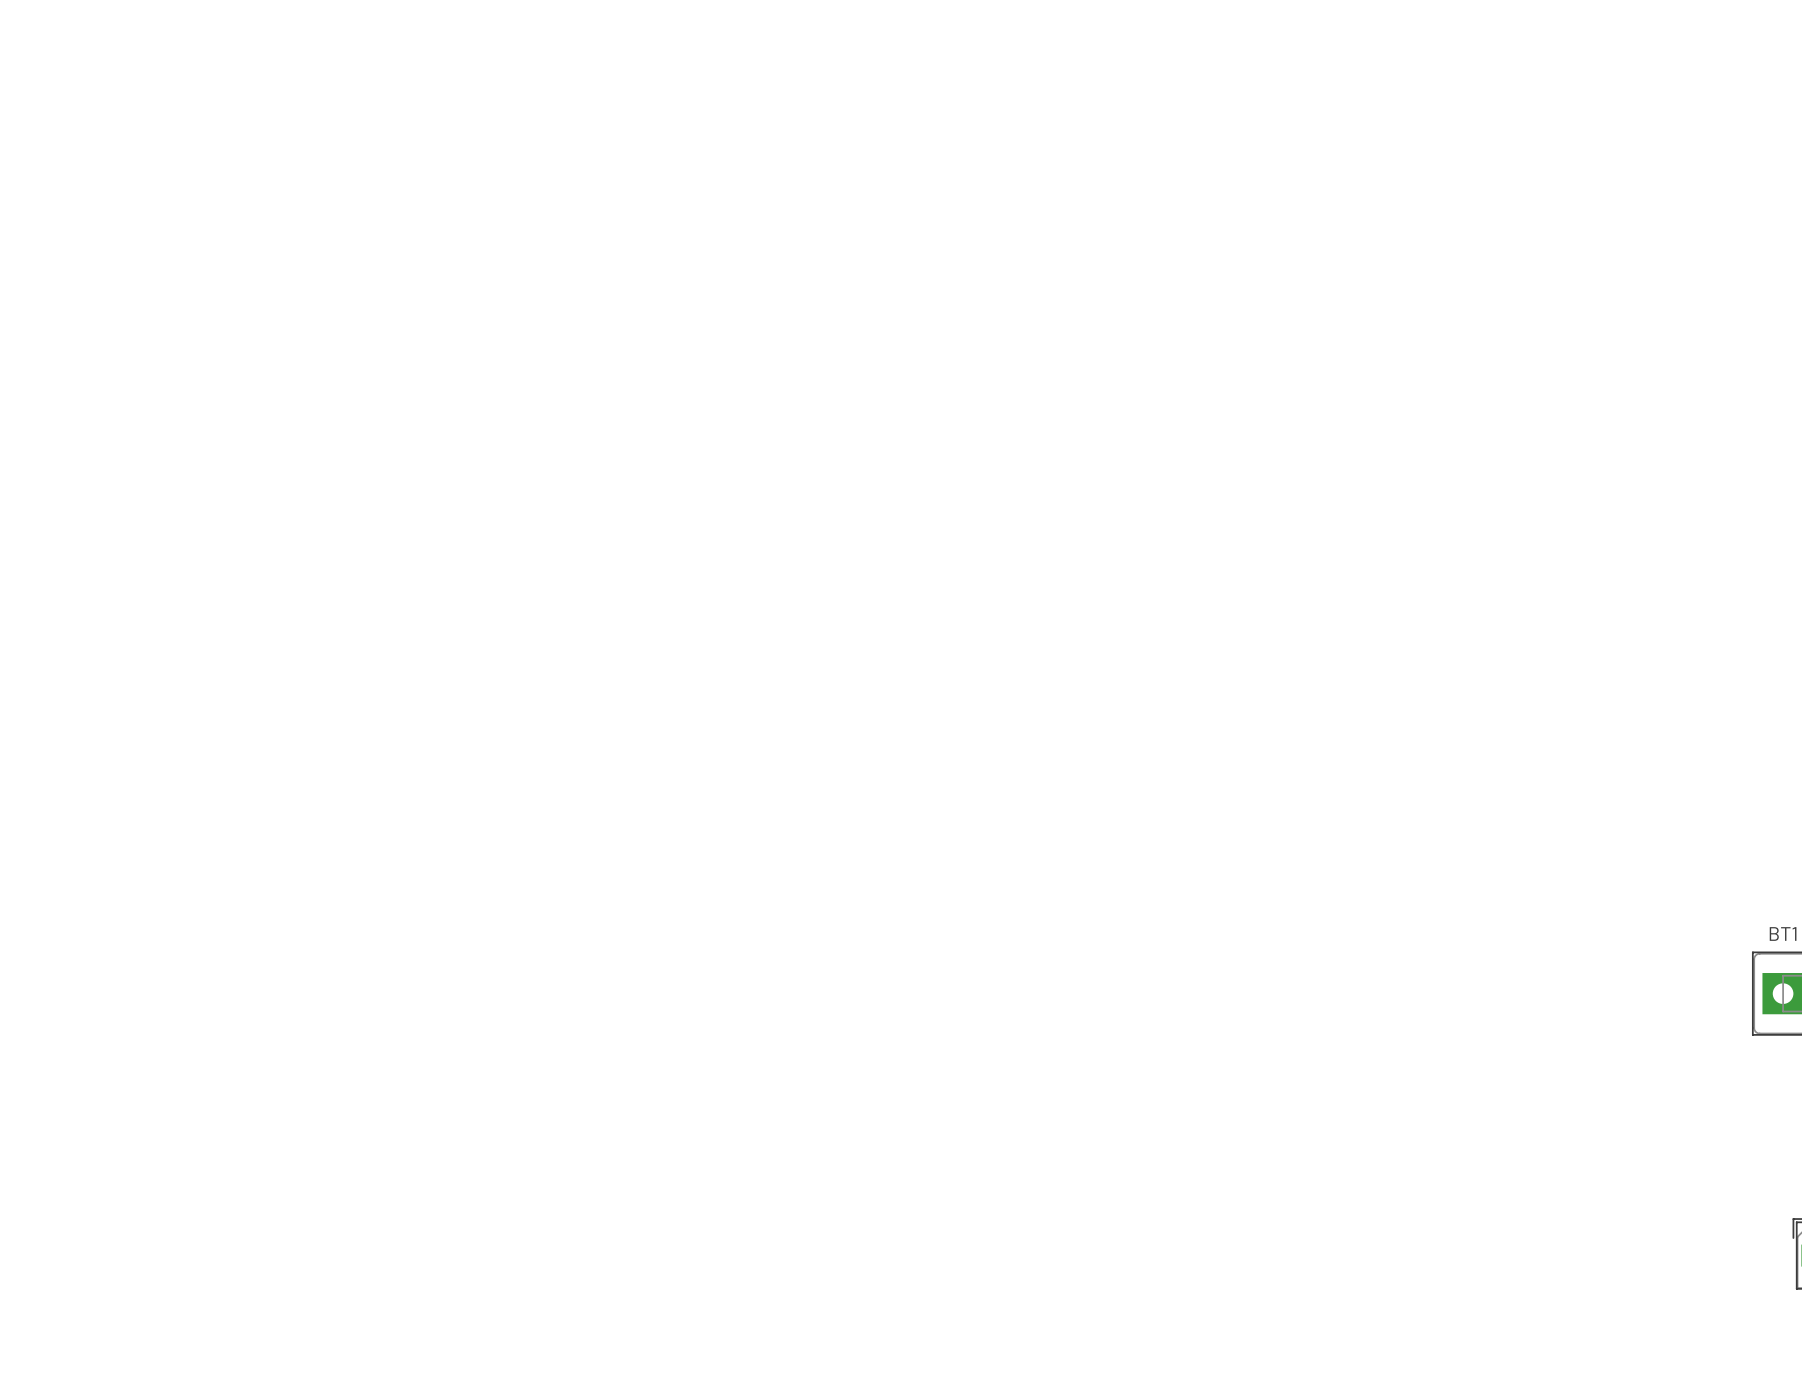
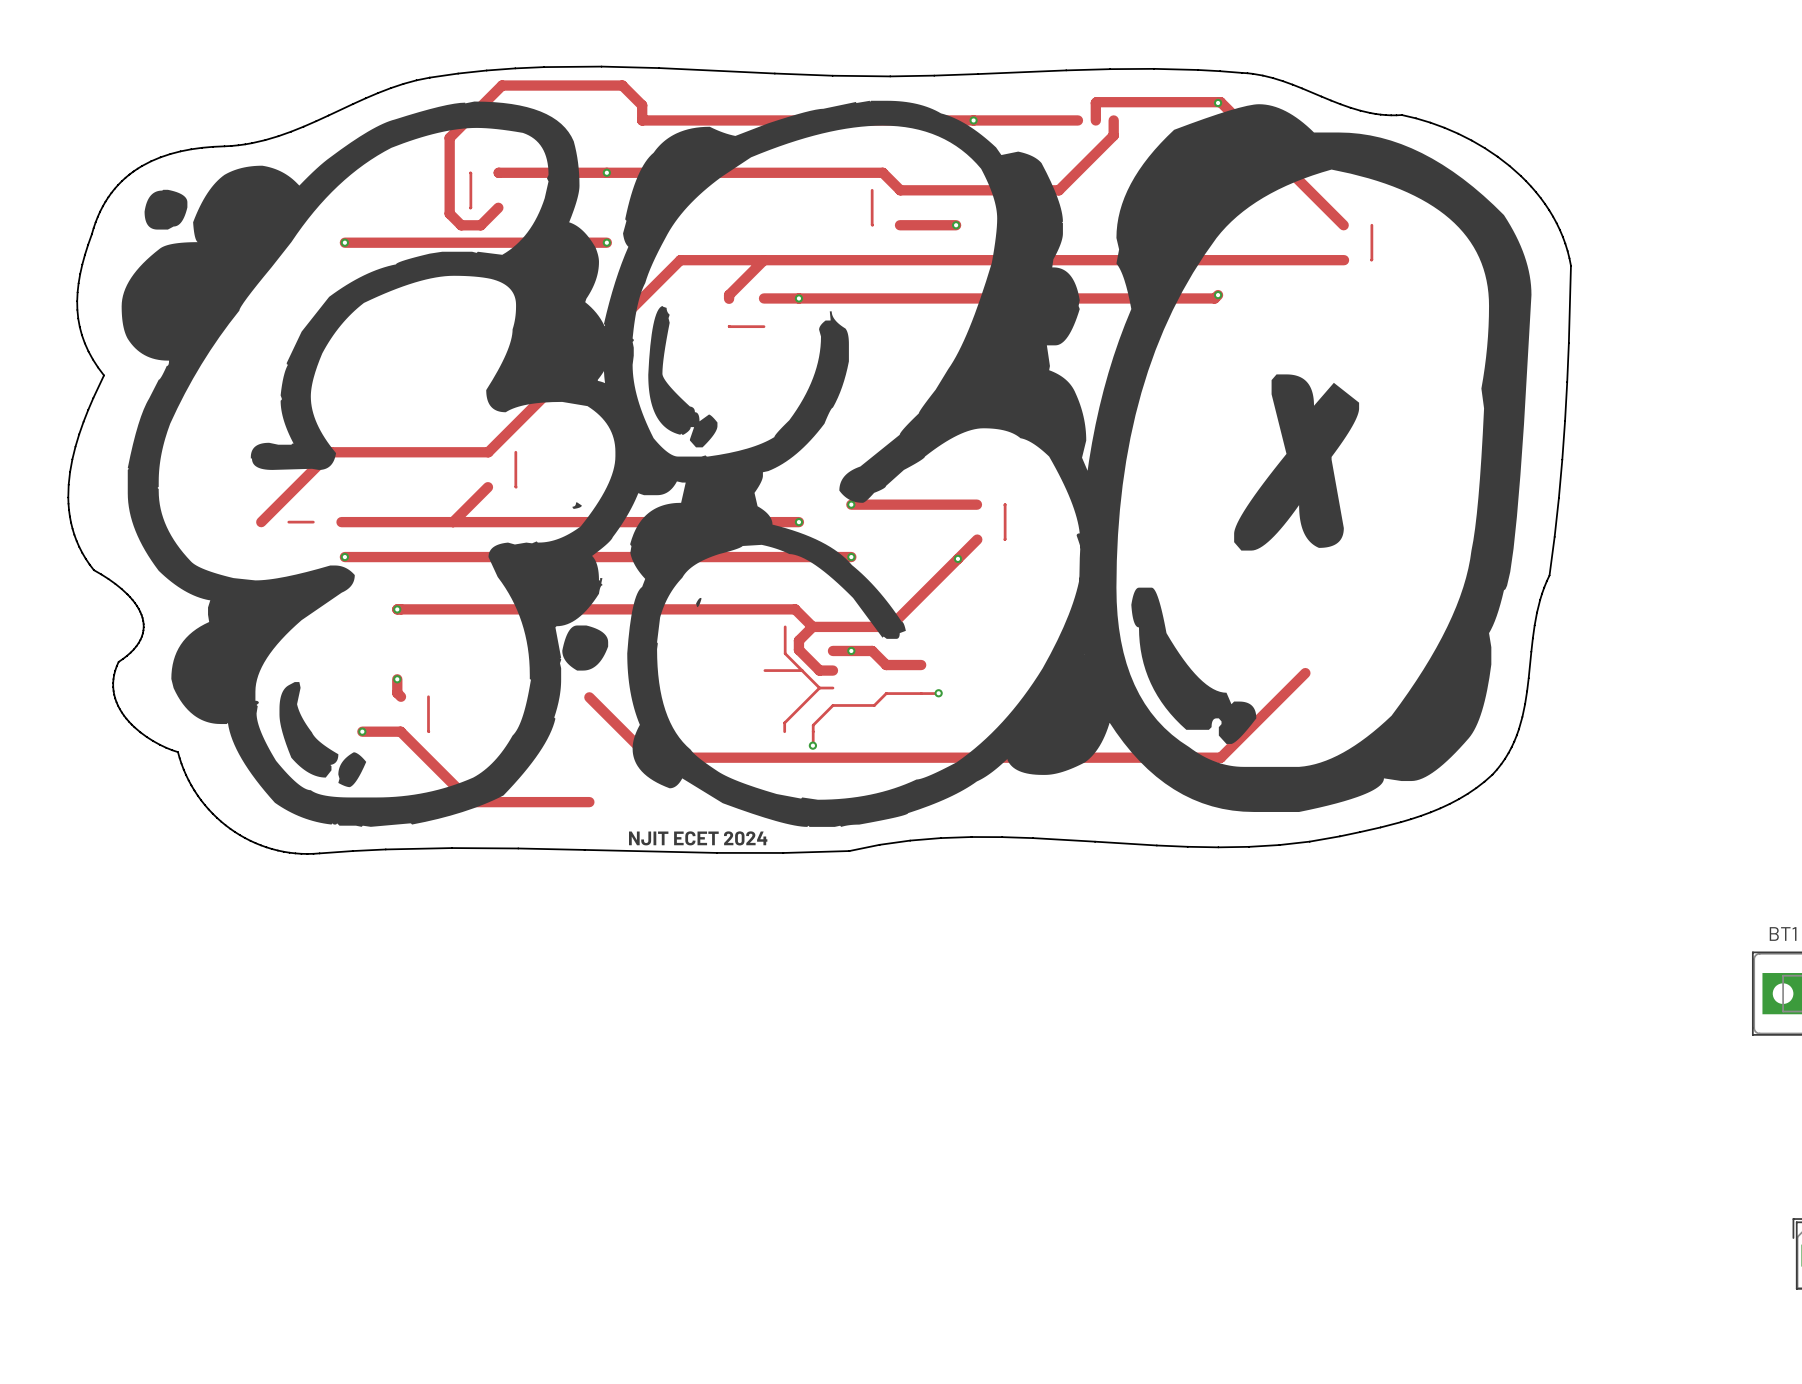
board edge: none -> (601, 66) (486, 70) (429, 77) (403, 83) (278, 136) (245, 144) (191, 149) (160, 157) (142, 166) (125, 177) (111, 192) (100, 211) (82, 264) (77, 301) (79, 326) (84, 343) (104, 375) (83, 421) (72, 459) (68, 497) (71, 522) (79, 546) (89, 564) (93, 570) (127, 594) (136, 605) (142, 617) (143, 630) (140, 639) (130, 652) (118, 661) (115, 670) (113, 687) (118, 705) (126, 718) (140, 732) (159, 744) (177, 752) (183, 769) (194, 790) (208, 809) (225, 825) (245, 838) (266, 847) (289, 852) (307, 853) (452, 848) (783, 852) (849, 851) (910, 840) (971, 837) (1033, 838) (1187, 846) (1249, 846) (1309, 841) (1360, 832) (1410, 819) (1440, 808) (1467, 793) (1492, 774) (1501, 764) (1514, 741) (1522, 716) (1537, 612) (1549, 575) (1558, 498) (1565, 420) (1570, 265) (1562, 236) (1549, 210) (1531, 186) (1509, 165) (1471, 140) (1430, 122) (1401, 115) (1380, 114) (1360, 110) (1282, 81) (1252, 73) (1198, 69) (1110, 69) (890, 76) (601, 66)
drawing: none -> [121, 100, 1532, 827]
via: none -> (1218, 103)
via: none -> (973, 120)
track: none -> (1077, 120) (642, 120) (642, 105) (622, 85) (502, 85) (449, 137) (449, 213) (461, 225) (480, 225) (498, 207)
track: none -> (1095, 120) (1096, 102) (1220, 102) (1343, 225)
track: none -> (1113, 120) (1113, 135) (1058, 190) (900, 190) (882, 172) (498, 172)
track: none -> (470, 172) (470, 208)
via: none -> (606, 172)
track: none -> (872, 190) (872, 225)
track: none -> (900, 225) (956, 225)
via: none -> (956, 225)
track: none -> (1371, 225) (1371, 260)
track: none -> (344, 242) (606, 242)
via: none -> (344, 242)
via: none -> (606, 242)
track: none -> (764, 260) (729, 295) (729, 298)
track: none -> (1344, 260) (680, 260) (488, 452) (331, 452) (261, 522)
track: none -> (1218, 295) (1214, 298) (764, 298)
via: none -> (1218, 295)
via: none -> (798, 298)
track: none -> (729, 326) (764, 326)
track: none -> (515, 452) (516, 487)
track: none -> (487, 487) (453, 522)
track: none -> (851, 504) (976, 504)
via: none -> (851, 504)
track: none -> (1004, 505) (1004, 539)
track: none -> (288, 522) (313, 522)
track: none -> (341, 522) (798, 522)
via: none -> (798, 522)
track: none -> (977, 539) (889, 626) (812, 626)
track: none -> (344, 557) (851, 557)
via: none -> (344, 557)
via: none -> (851, 557)
via: none -> (957, 558)
track: none -> (397, 609) (795, 609) (812, 626)
via: none -> (397, 609)
track: none -> (785, 626) (785, 653) (819, 688)
track: none -> (812, 626) (798, 640) (798, 649) (819, 670) (832, 670)
track: none -> (832, 650) (872, 650) (886, 665) (921, 665)
via: none -> (851, 650)
track: none -> (764, 670) (802, 670)
track: none -> (1305, 673) (1220, 757) (649, 757) (589, 697)
track: none -> (397, 679) (397, 693) (400, 696)
via: none -> (397, 679)
track: none -> (819, 688) (832, 688)
track: none -> (819, 688) (784, 722) (784, 731)
track: none -> (938, 693) (886, 693) (874, 705) (832, 705) (813, 725) (812, 745)
via: none -> (938, 693)
track: none -> (428, 696) (428, 731)
track: none -> (362, 731) (400, 731) (471, 802) (589, 802)
via: none -> (362, 731)
via: none -> (812, 745)
text: none -> NJIT ECET 2024 (698, 838)

